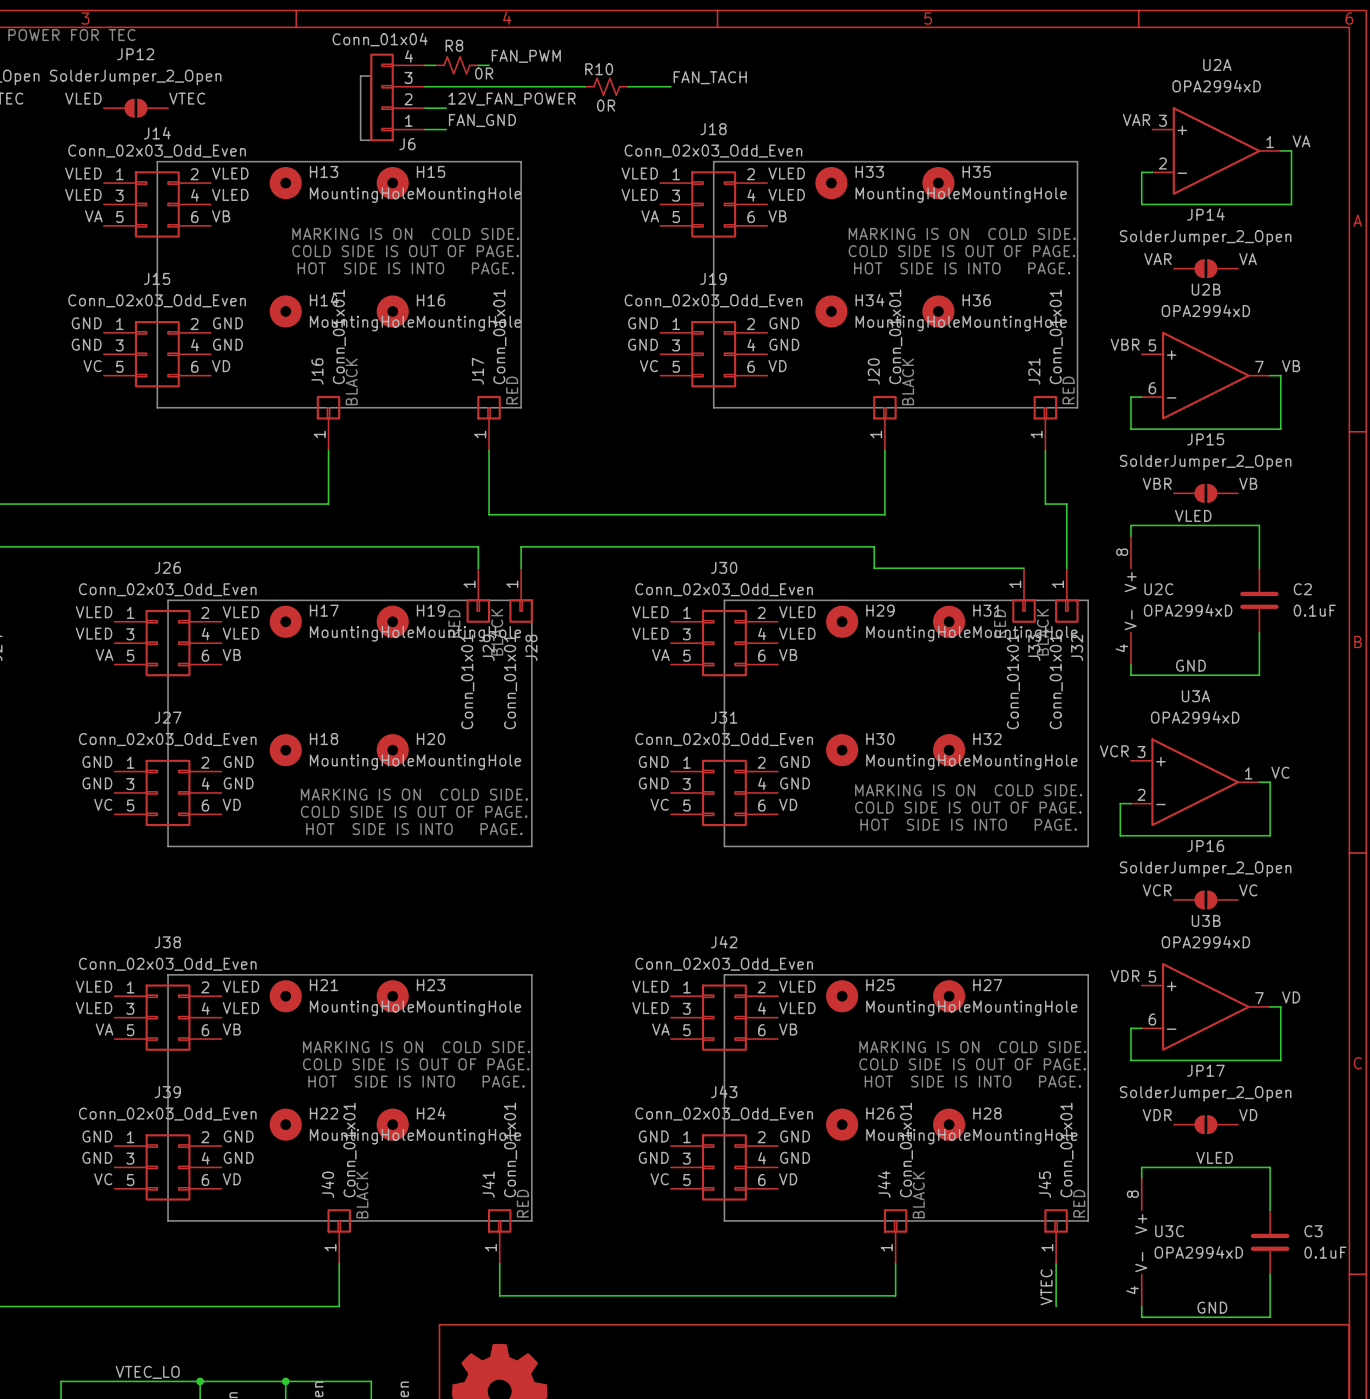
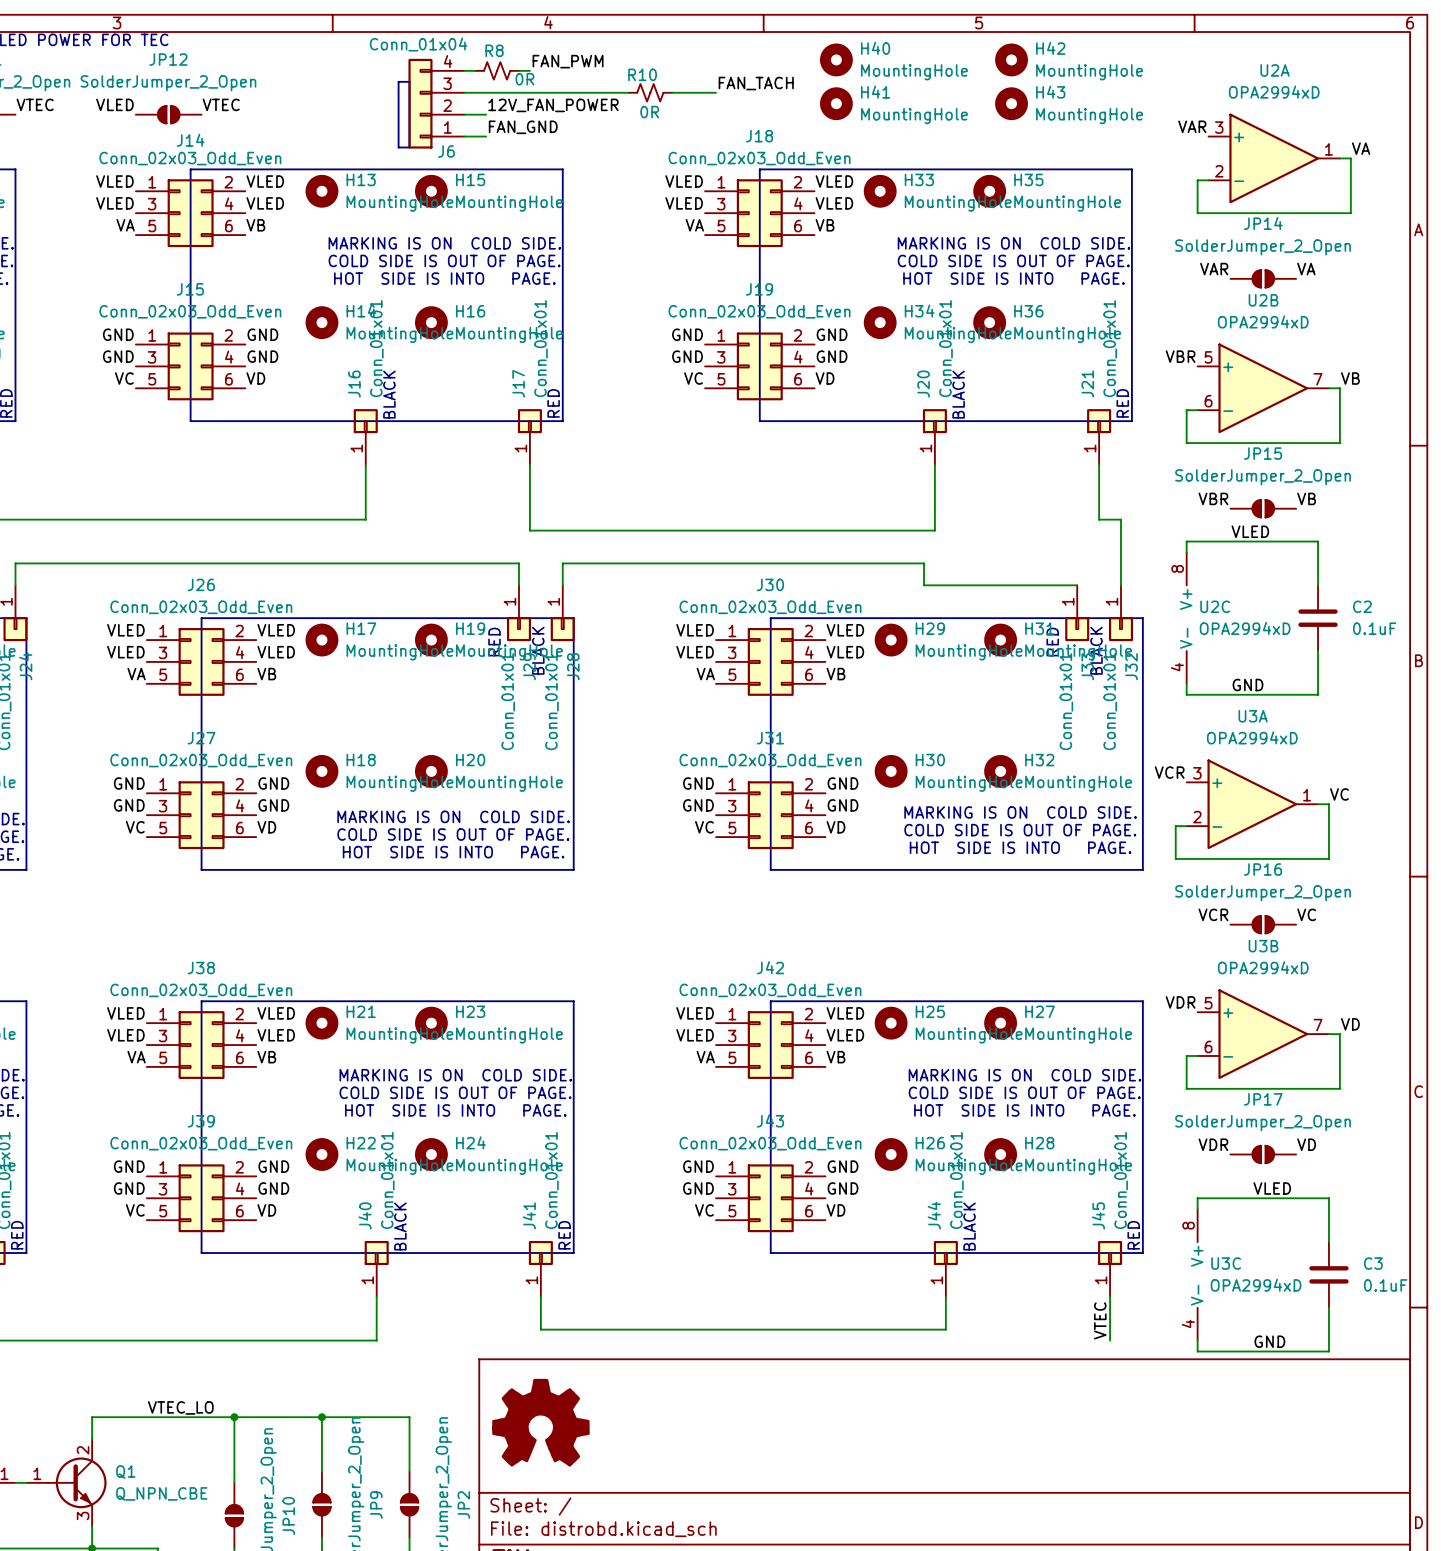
H40: none -> MountingHole (836, 59)
H42: none -> MountingHole (1011, 59)
H41: none -> MountingHole (836, 103)
H43: none -> MountingHole (1011, 103)

